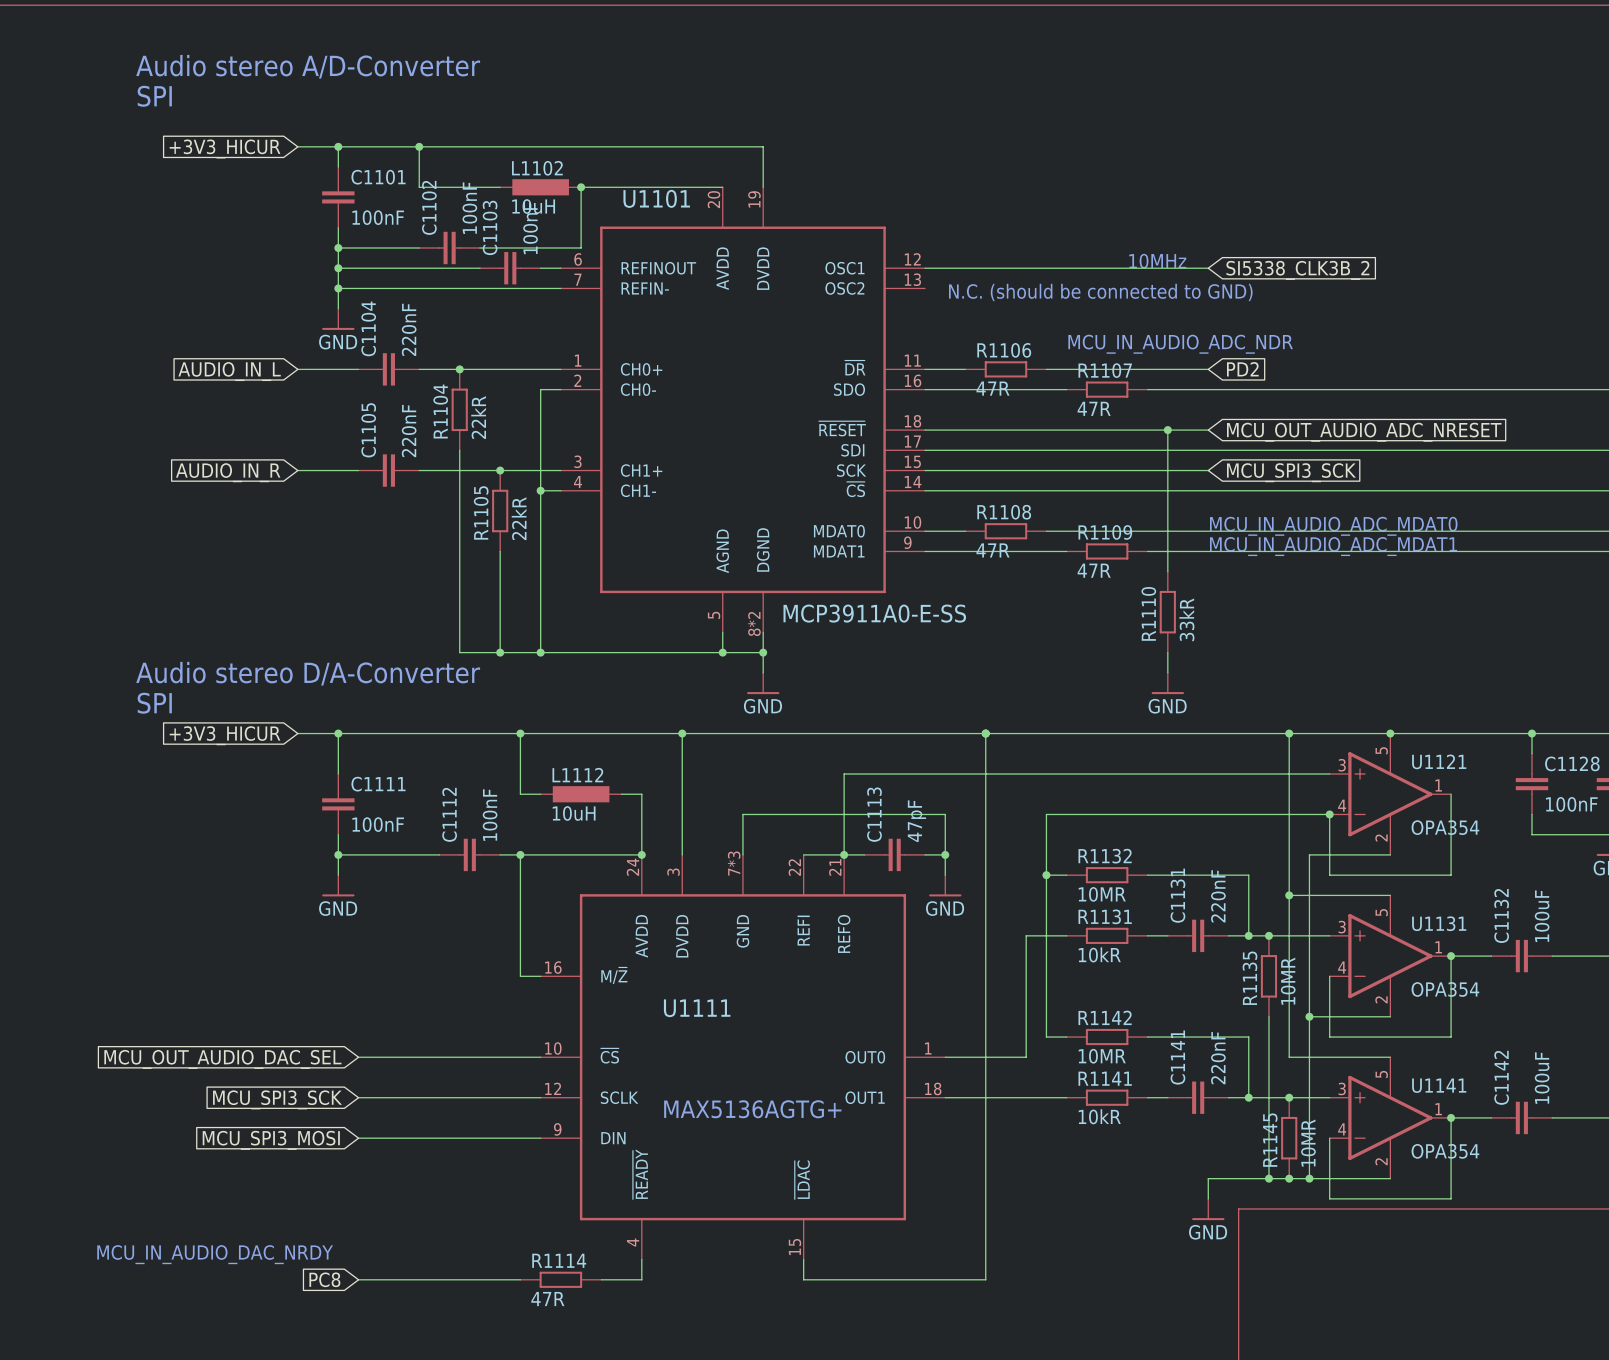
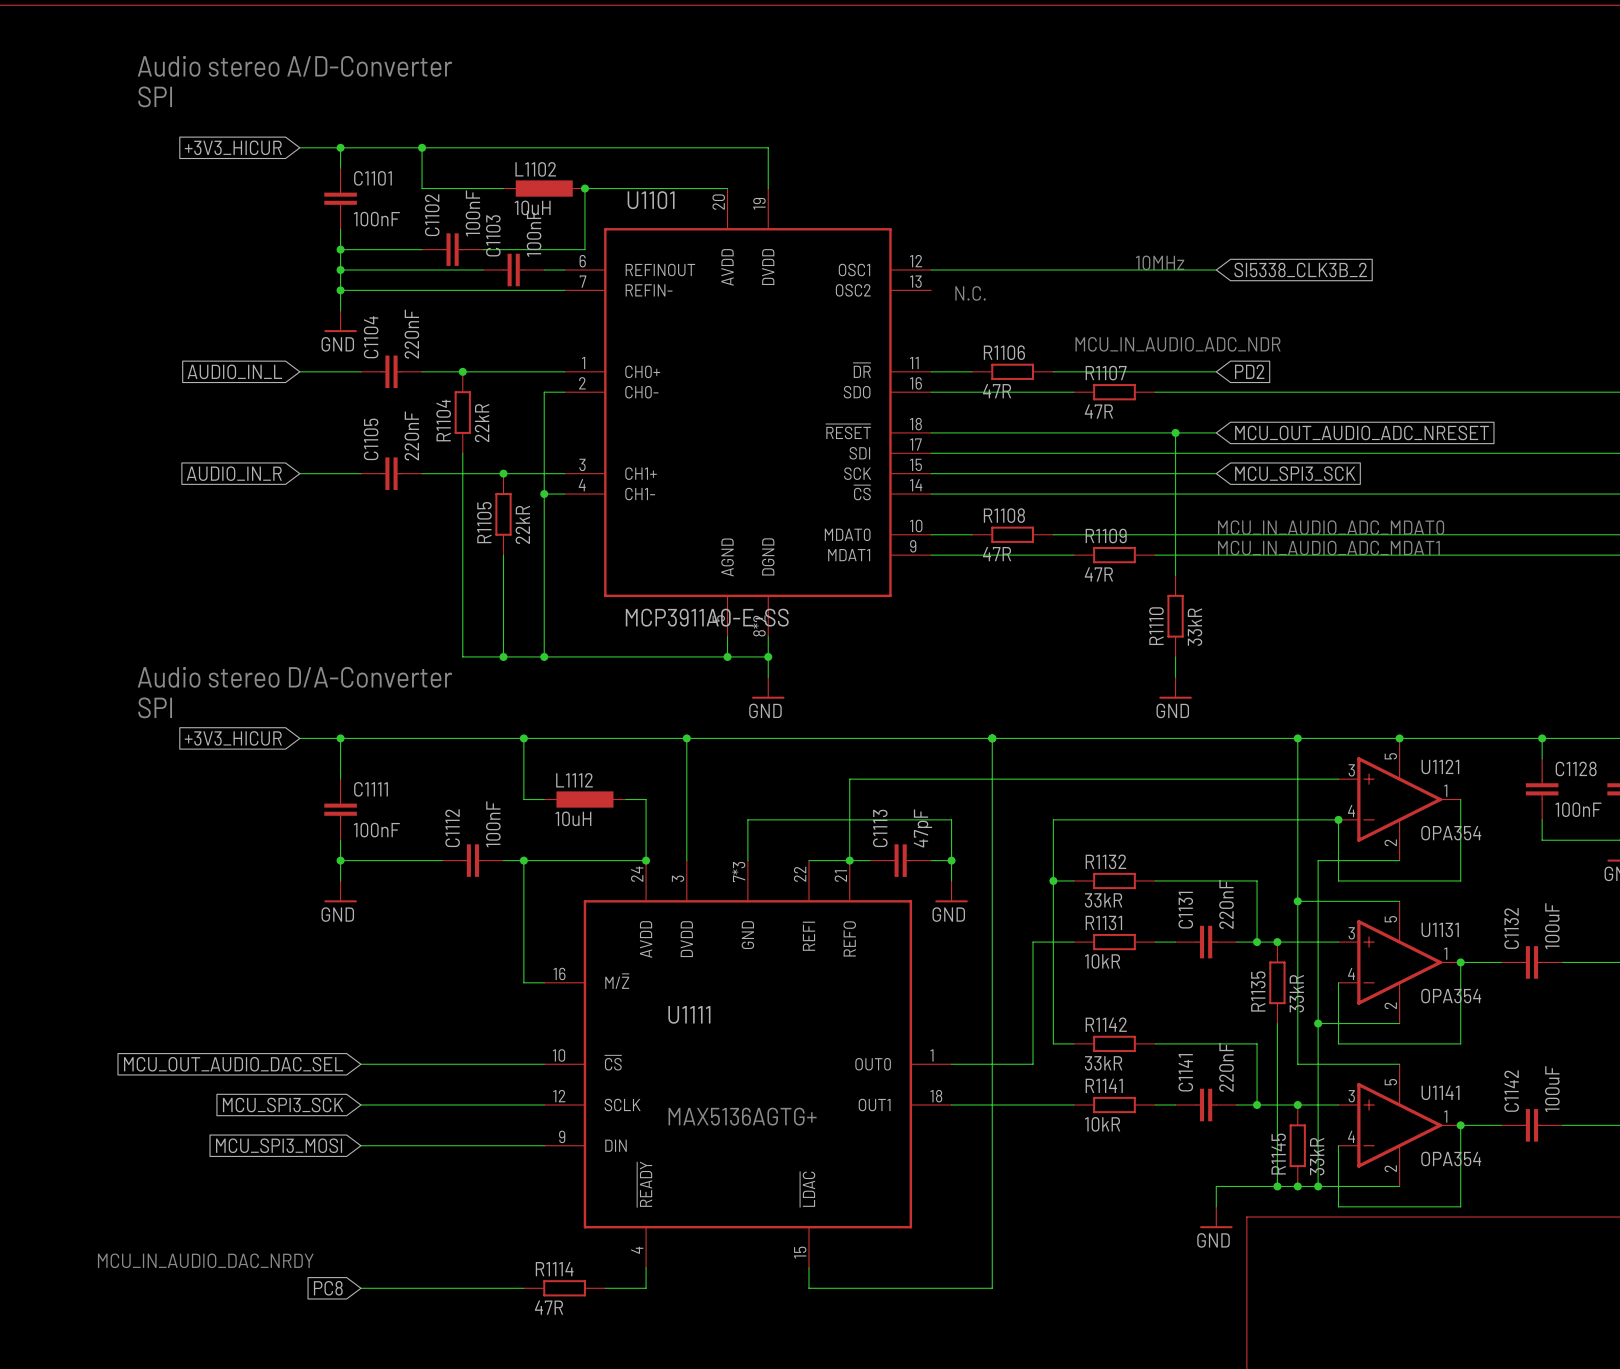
text: N.C. (should be connected to GND) (1100, 292) -> N.C. (970, 293)
U1101 value position: MCP3911A0-E-SS (874, 613) -> MCP3911A0-E-SS (707, 617)
R1132 value: 10MR (1102, 894) -> 33kR (1103, 900)
R1135 value: 10MR (1288, 981) -> 33kR (1296, 993)
R1142 value: 10MR (1102, 1056) -> 33kR (1103, 1063)
R1145 value: 10MR (1308, 1143) -> 33kR (1317, 1156)

